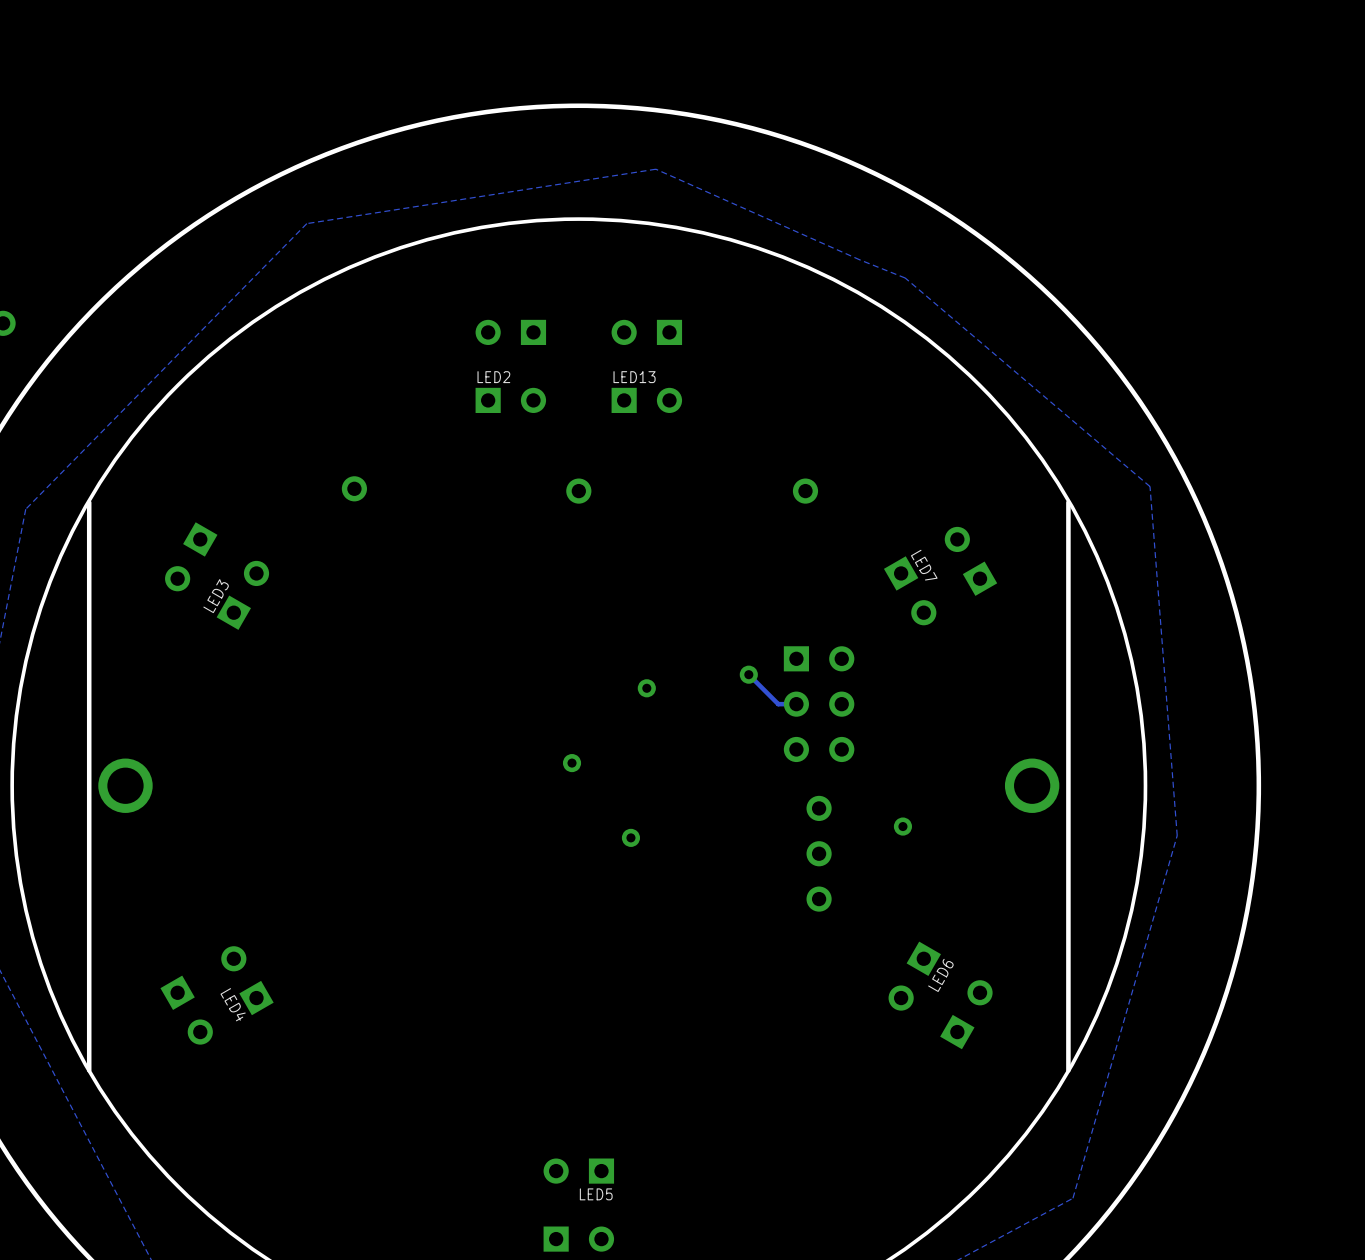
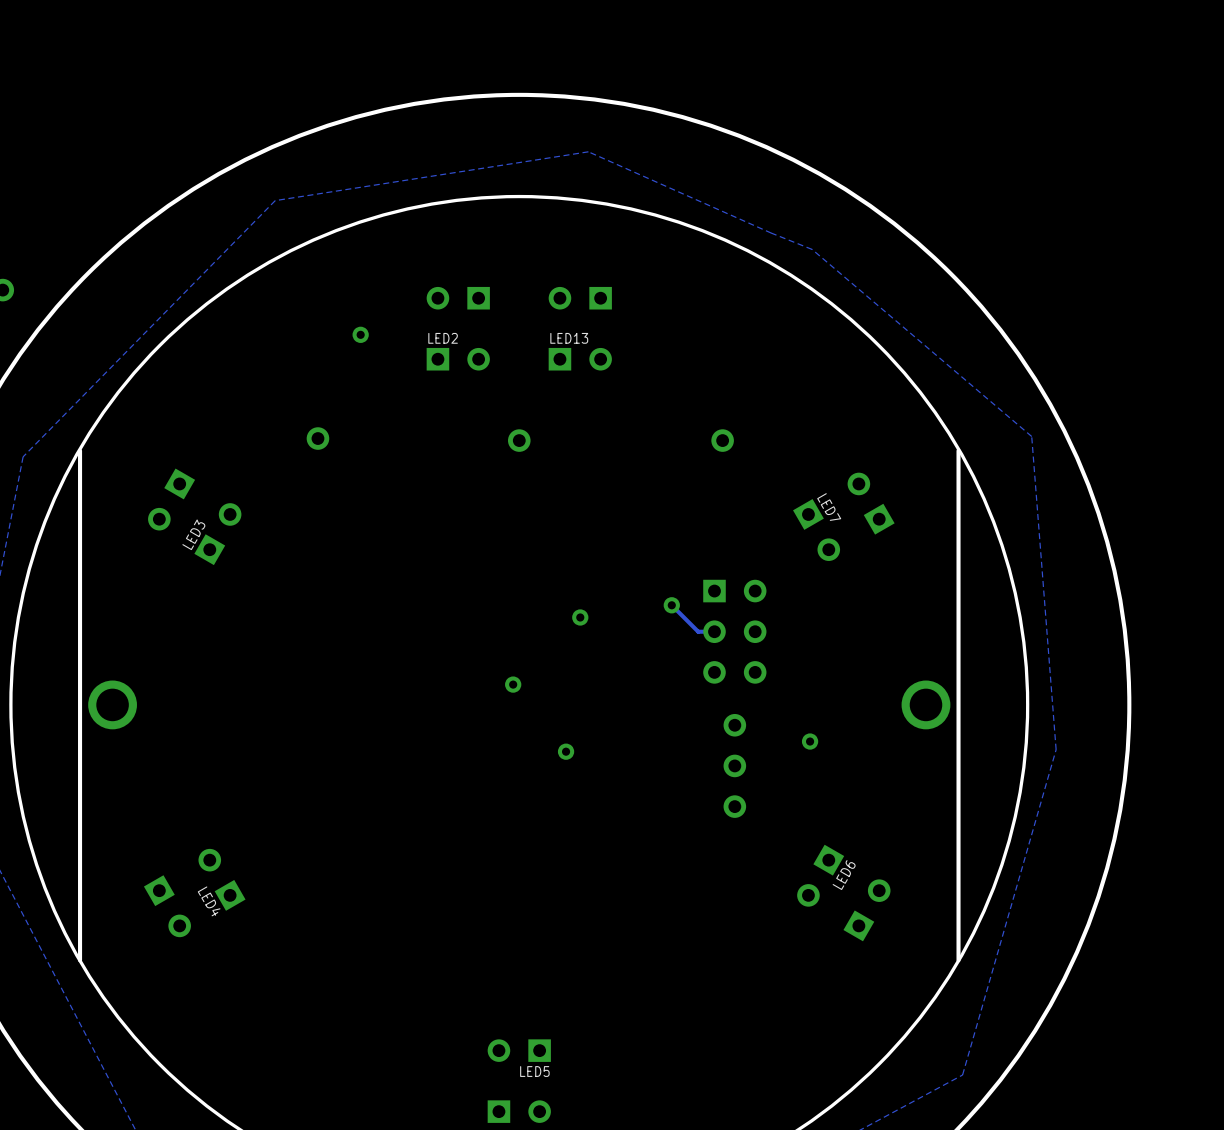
via: none -> (360, 334)

